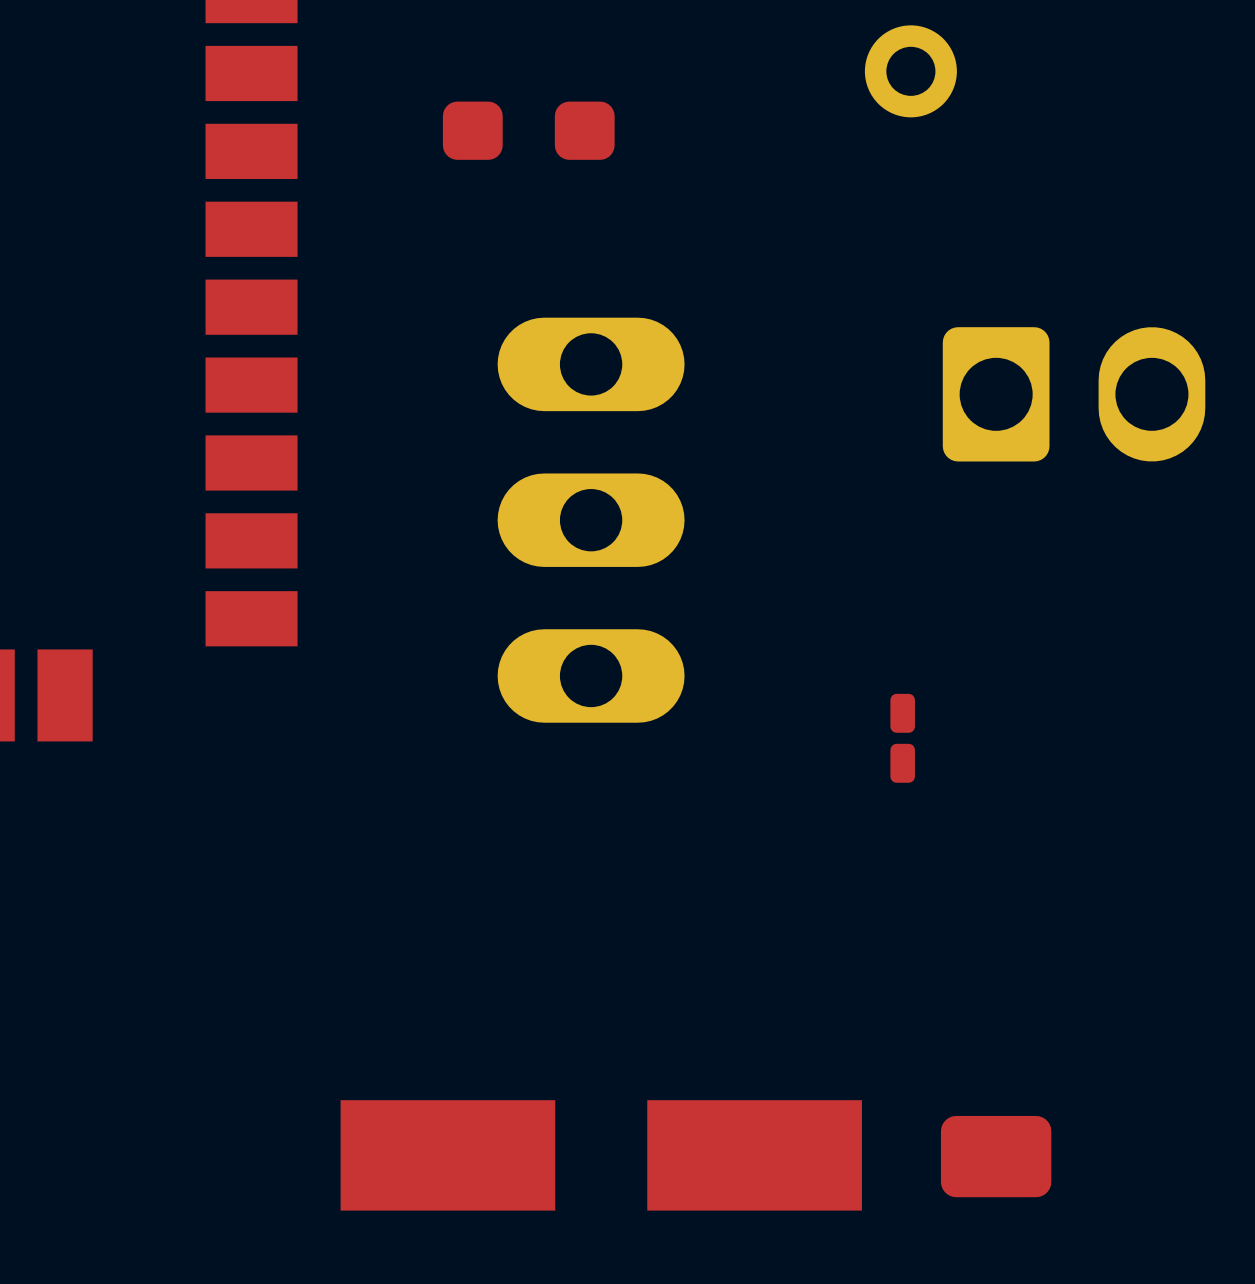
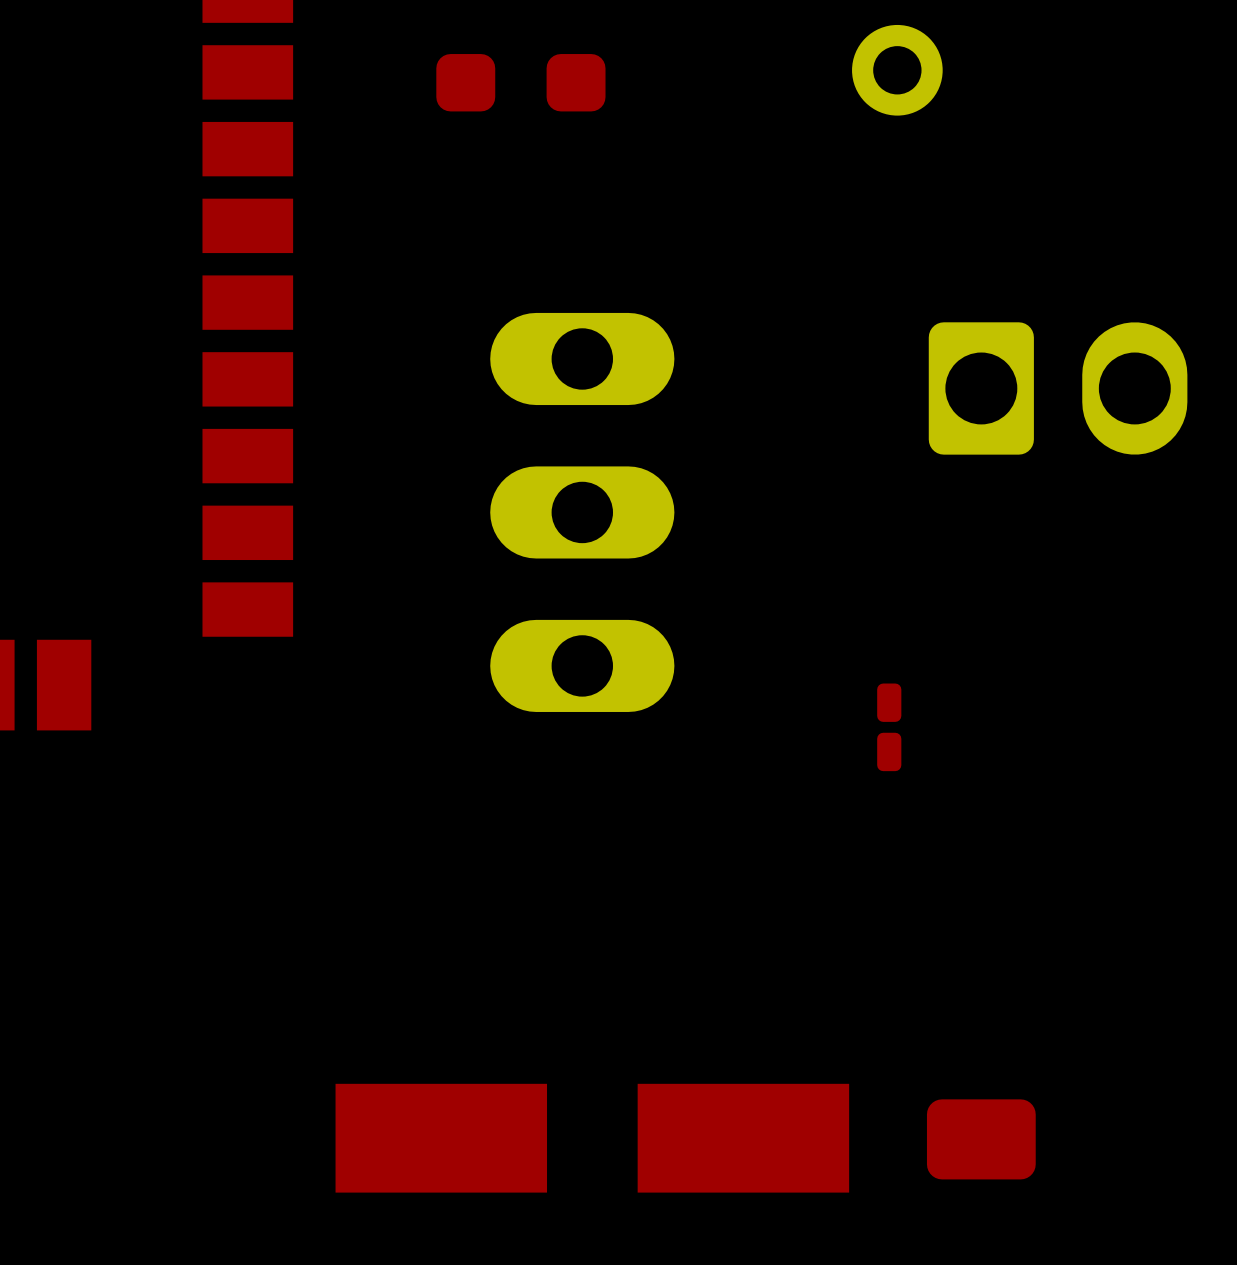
part position: (528, 130) -> (520, 82)

